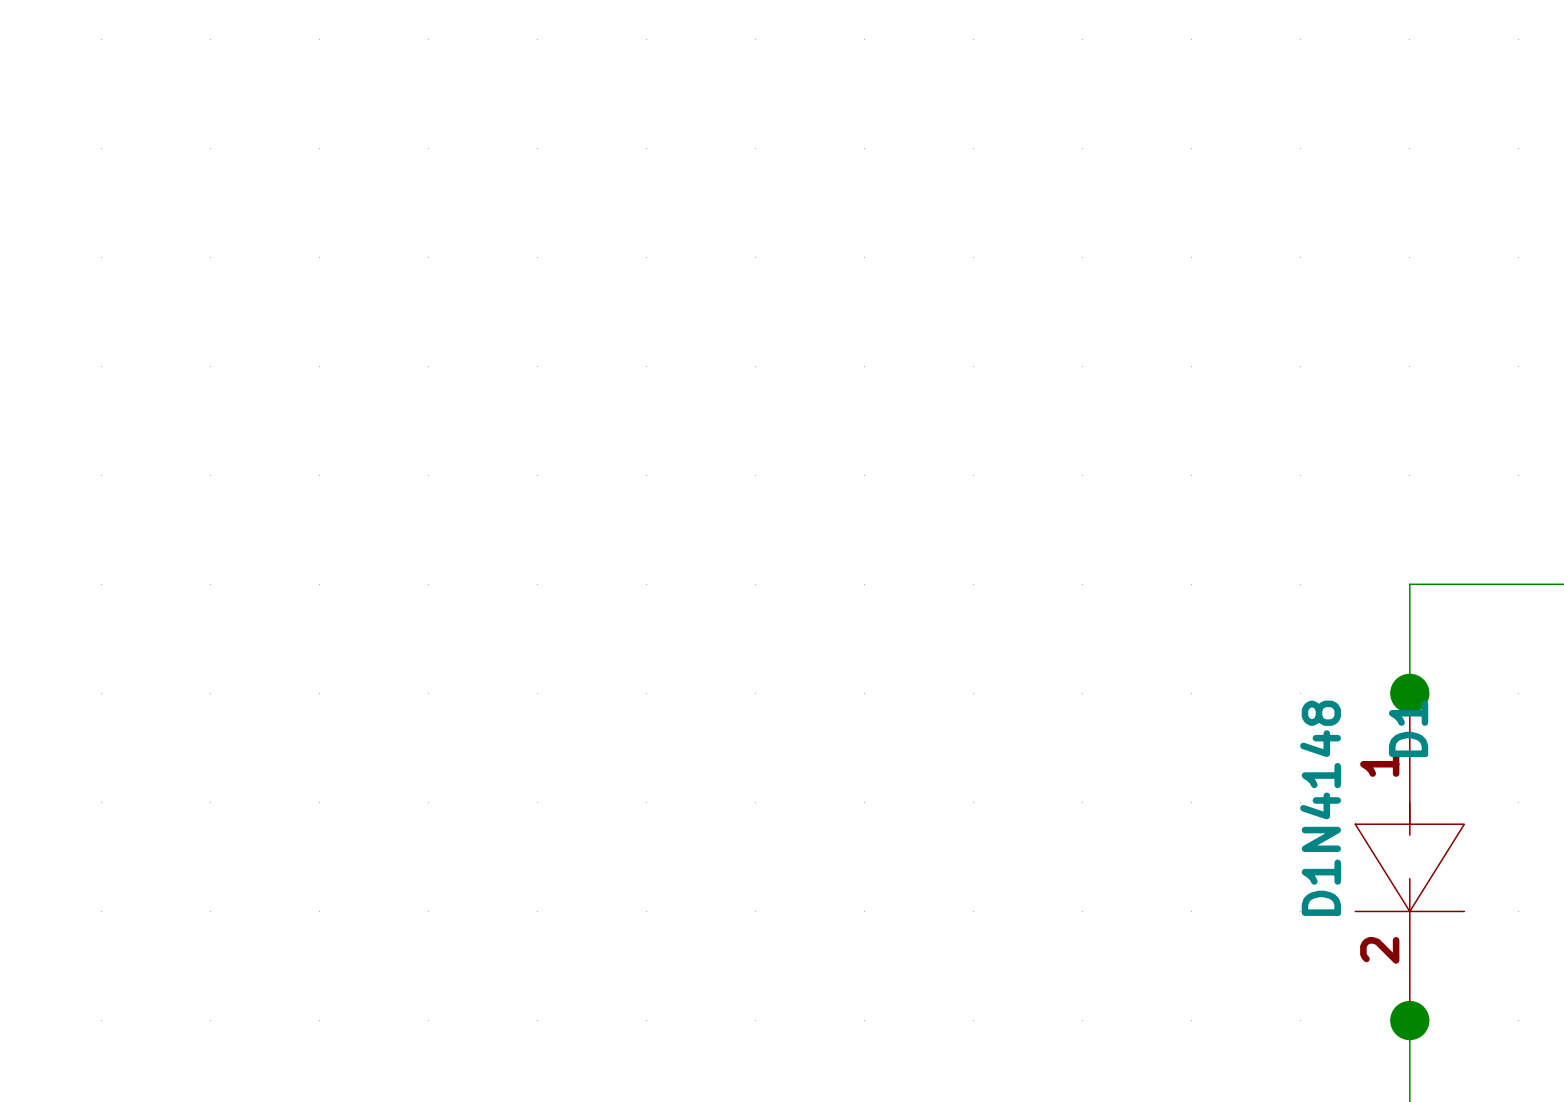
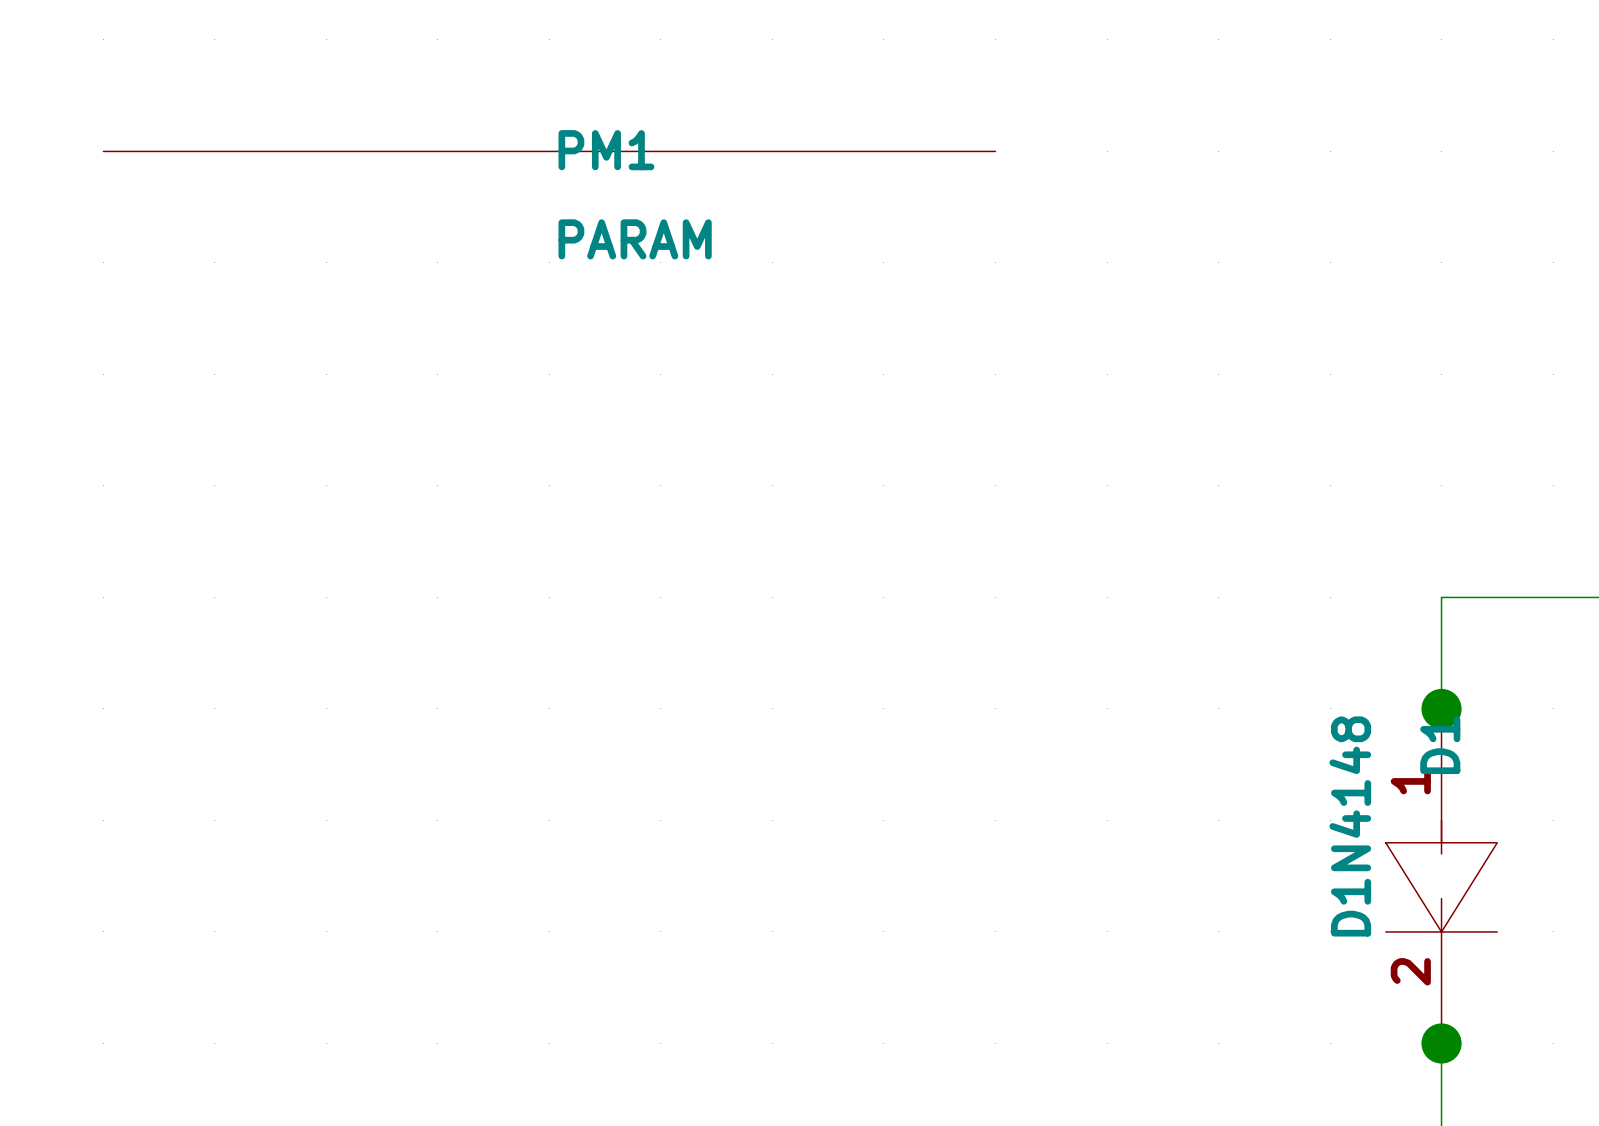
PM1: none -> PARAM (549, 151)

